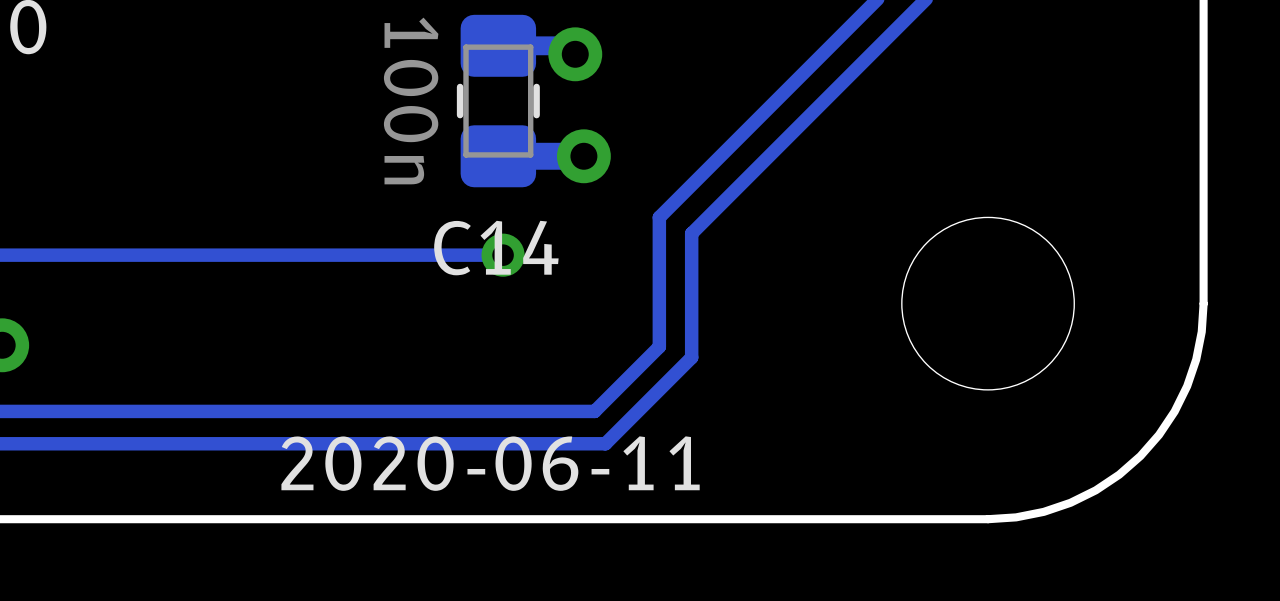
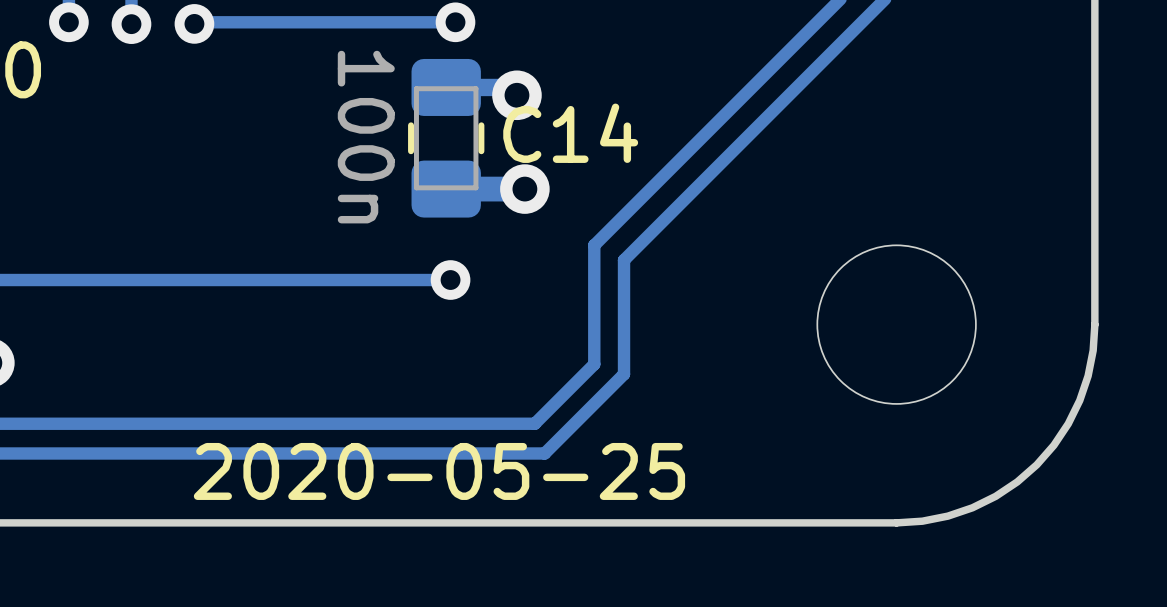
C14 name position: C14 (496, 248) -> C14 (570, 133)
text: 2020-06-11 (490, 463) -> 2020-05-25 (439, 471)

